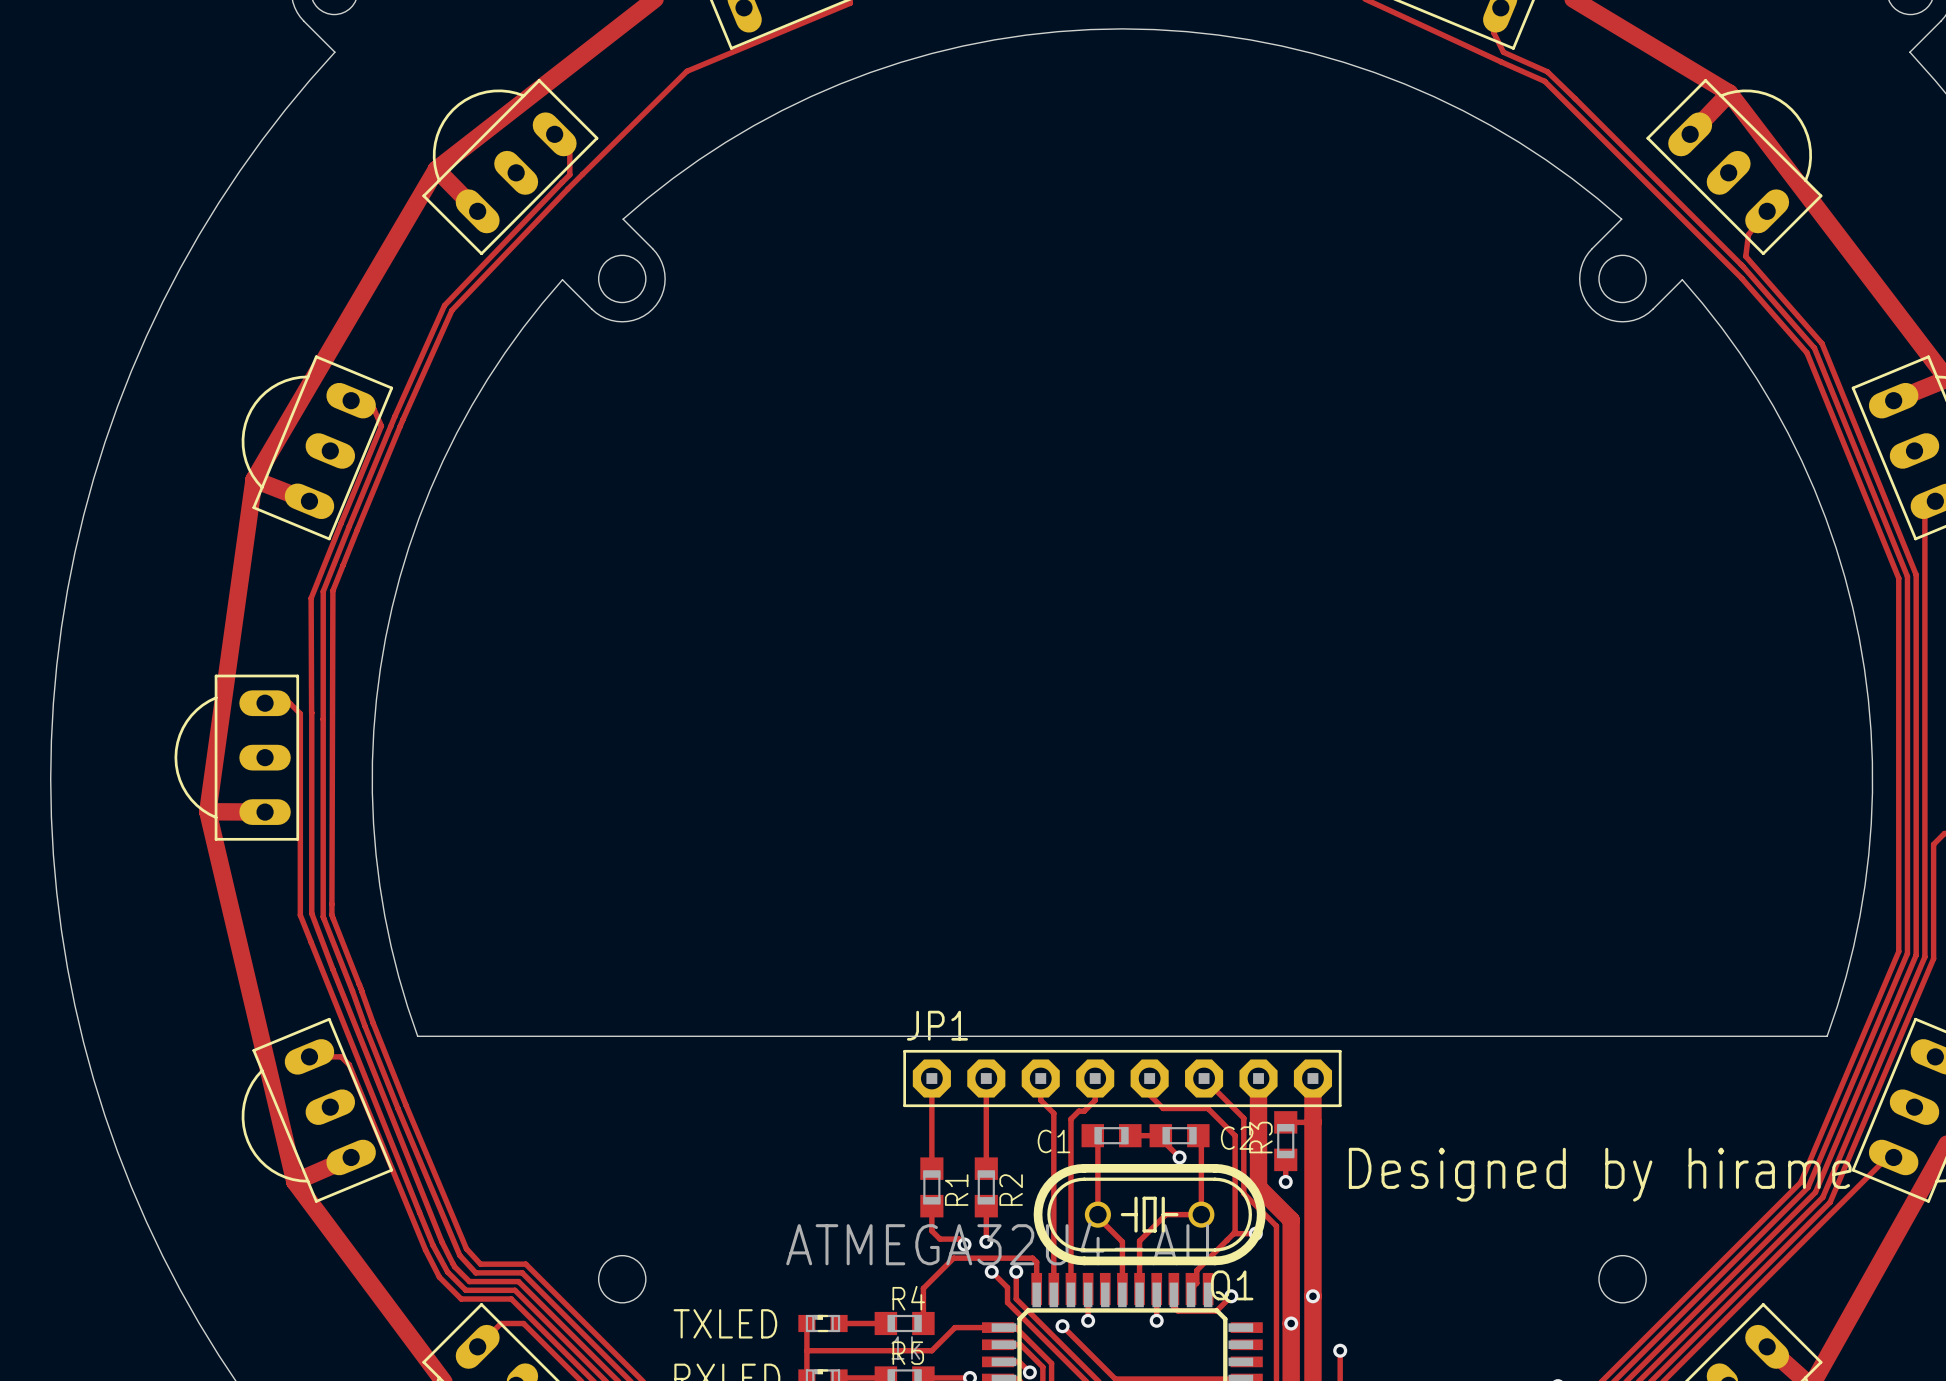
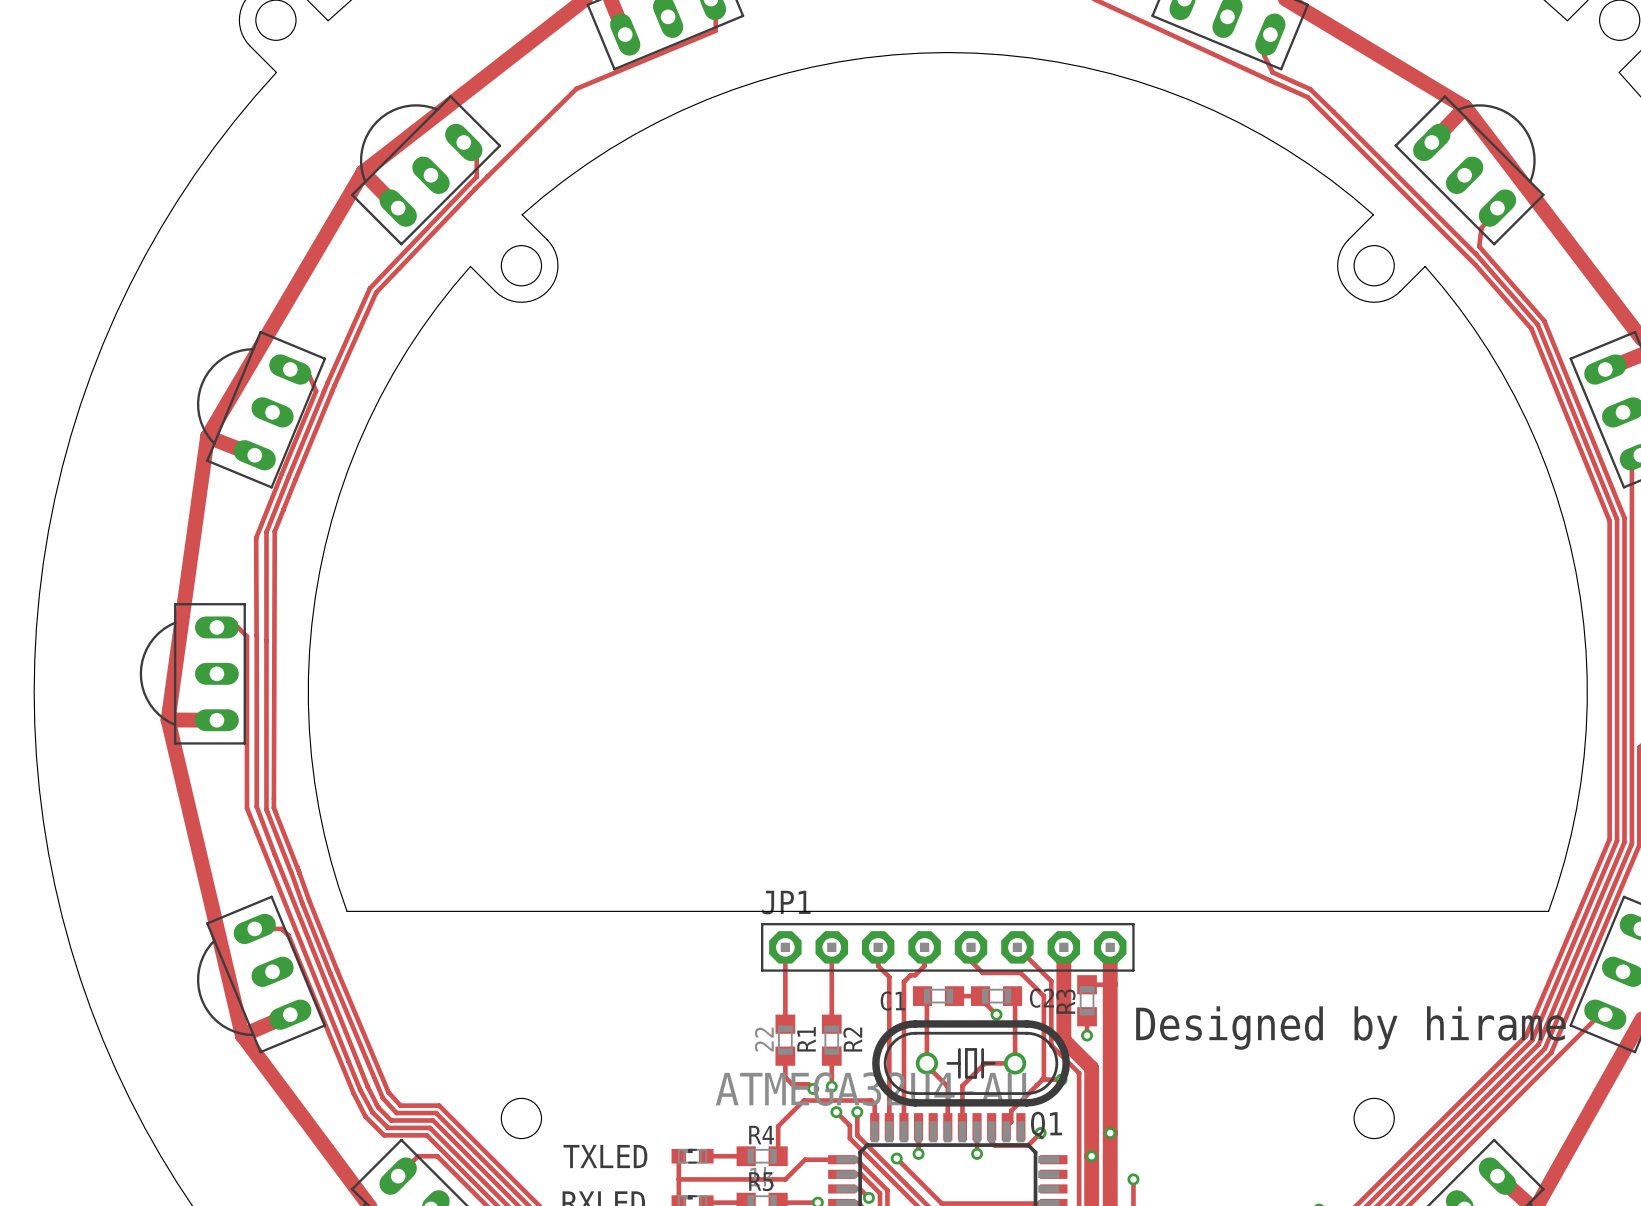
R1 value: none -> 22 (764, 1039)

